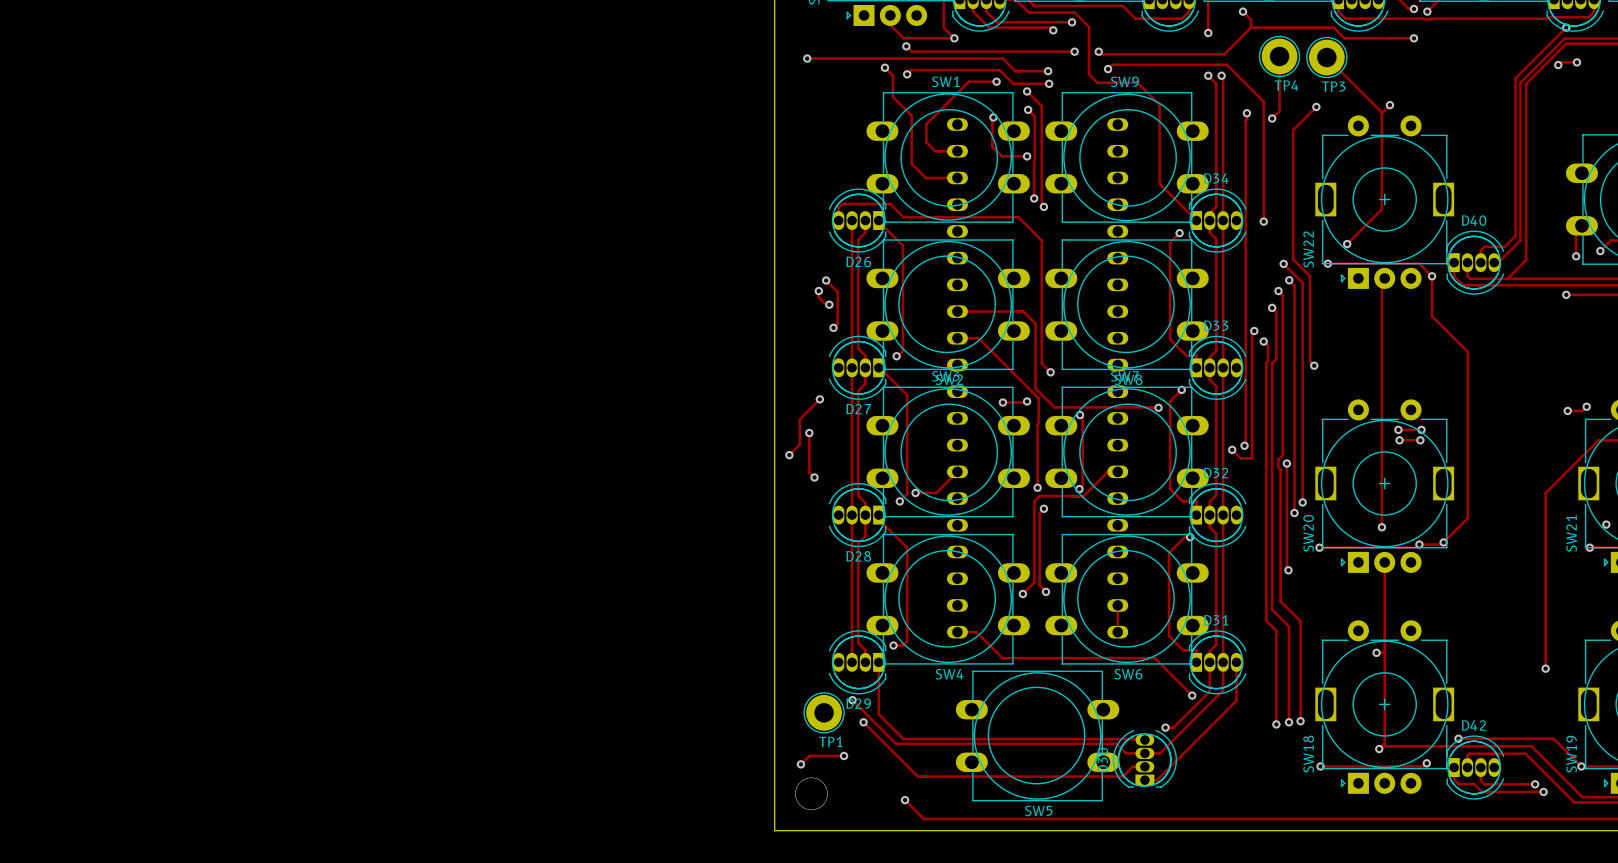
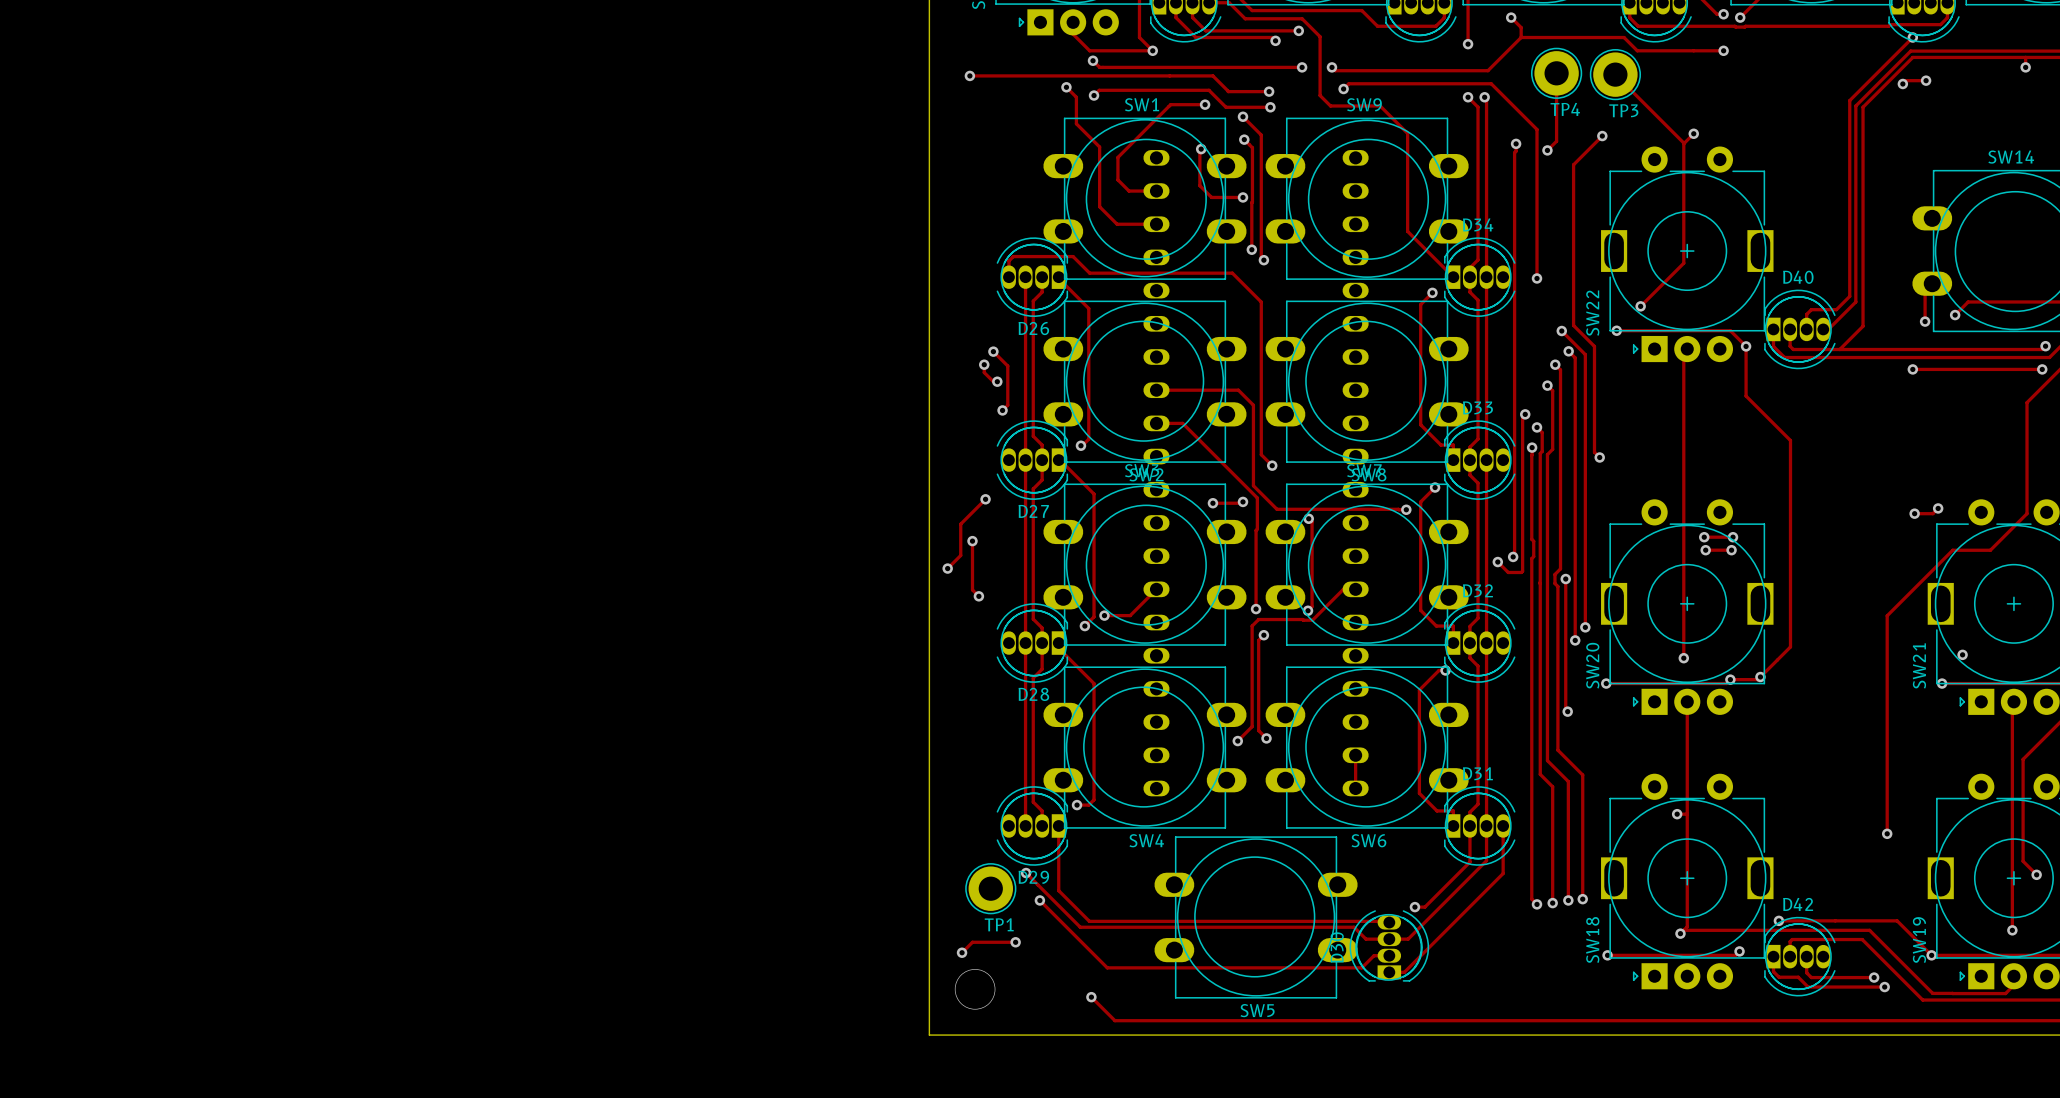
track: none -> (1532, 447) (1531, 539) (1533, 541) (1533, 556) (1531, 558) (1531, 899) (1537, 904)
via: none -> (1532, 447)
track: (957, 632) (976, 632) (1002, 658) (1154, 658) (1192, 695) -> none
via: (1192, 695) -> none
via: none -> (1537, 904)

